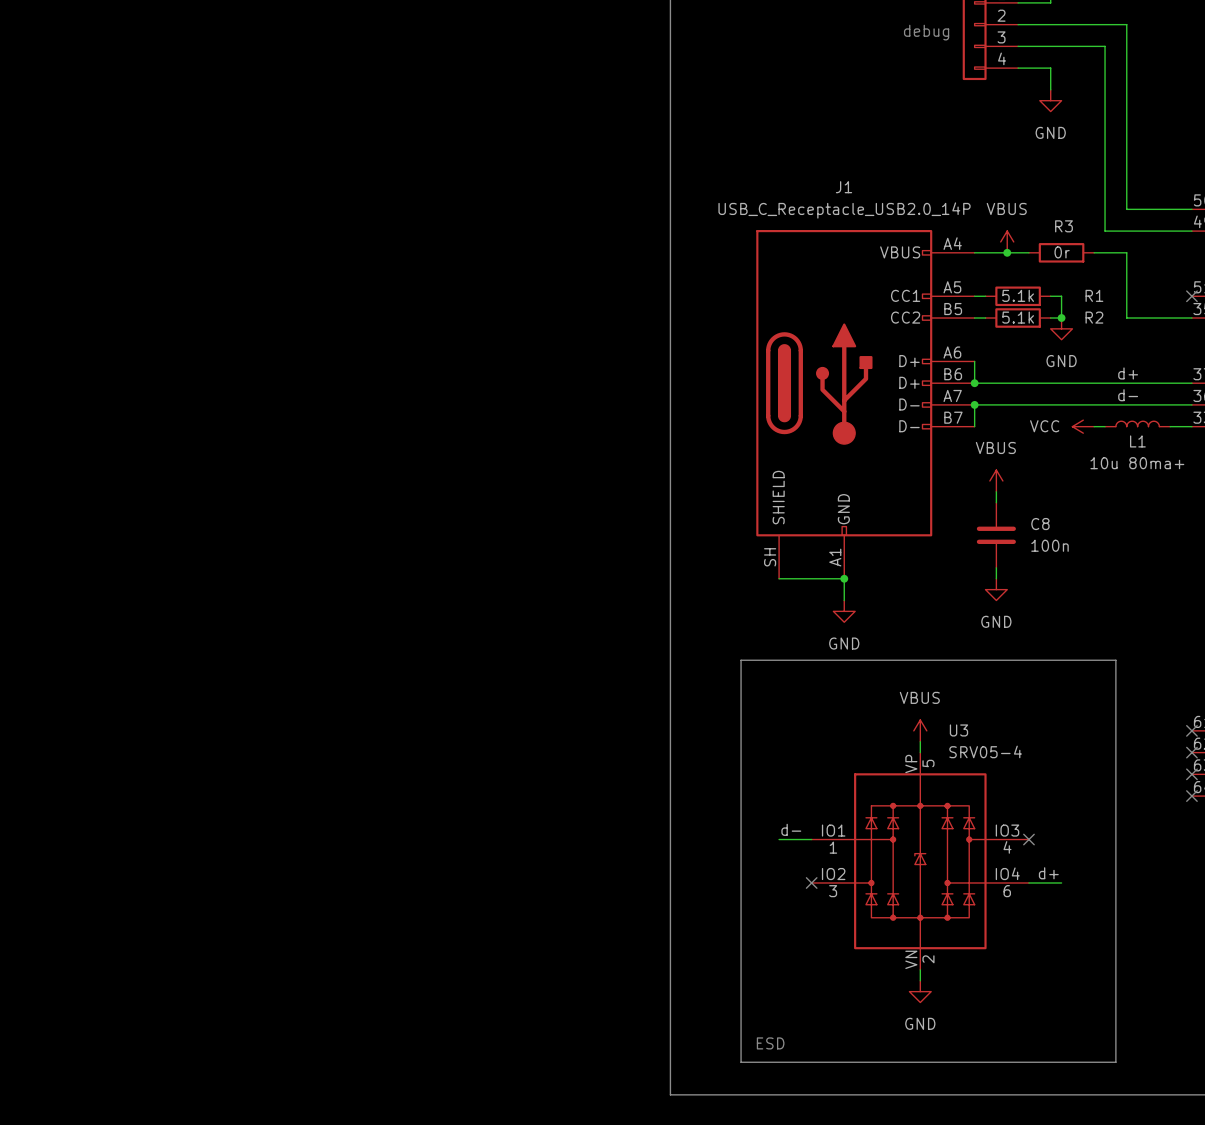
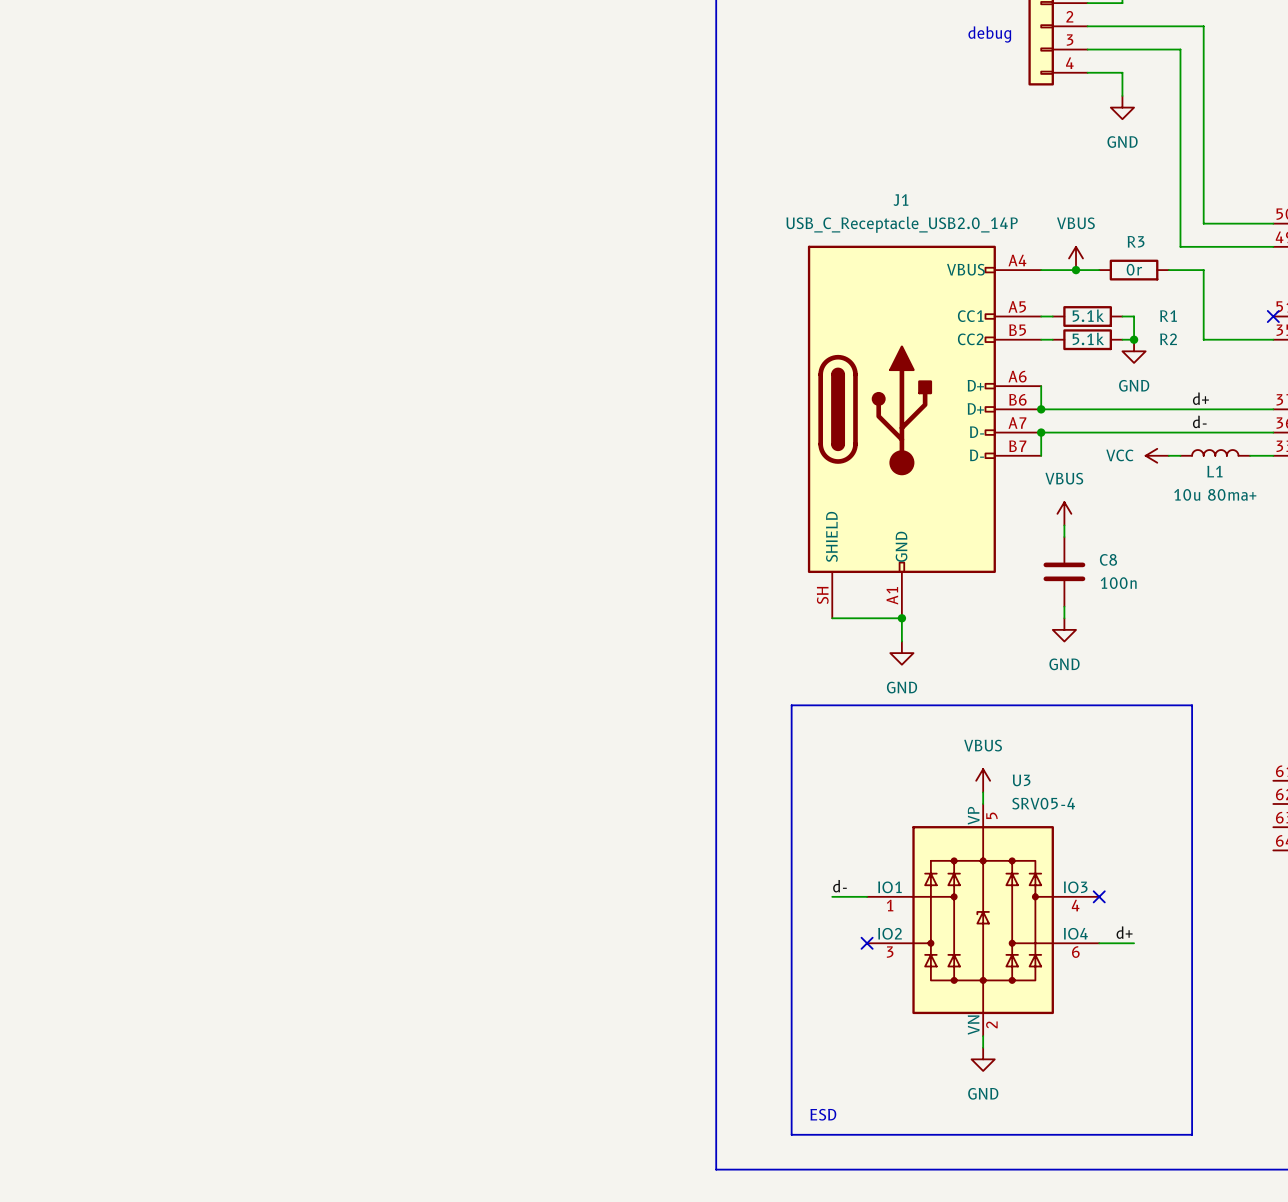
no-connect mark: (1191, 730) -> none
no-connect mark: (1191, 752) -> none
no-connect mark: (1191, 774) -> none
no-connect mark: (1191, 796) -> none

